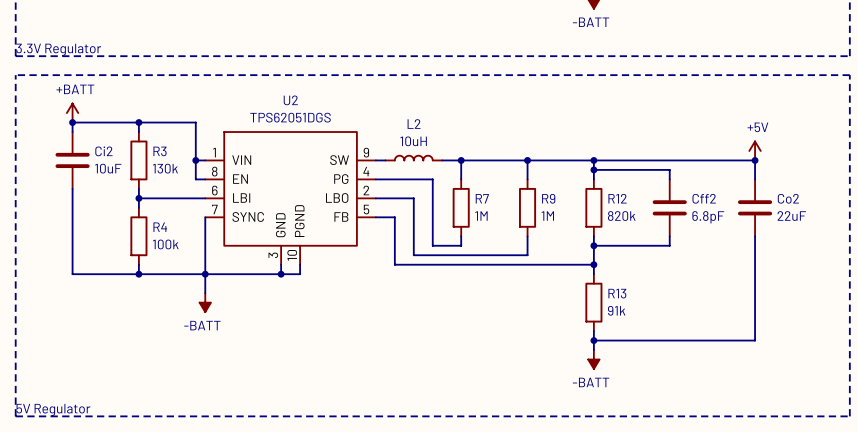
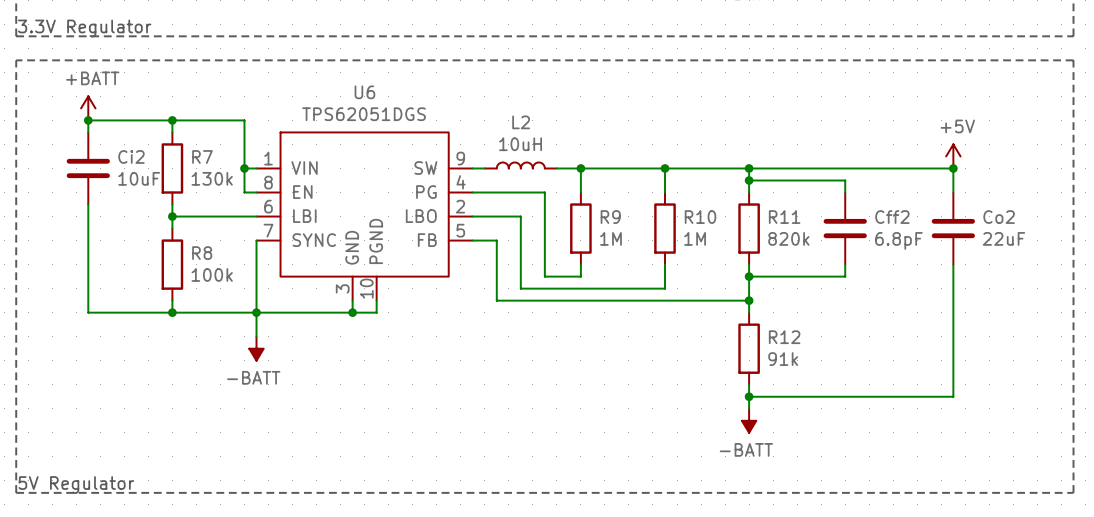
U2 name: U2 (290, 100) -> U6 (364, 92)
R3 name: R3 (160, 151) -> R7 (202, 156)
R7 name: R7 (482, 198) -> R9 (610, 217)
R9 name: R9 (548, 198) -> R10 (700, 217)
R12 name: R12 (617, 198) -> R11 (784, 217)
R4 name: R4 (160, 227) -> R8 (202, 253)
R13 name: R13 (617, 293) -> R12 (784, 337)

